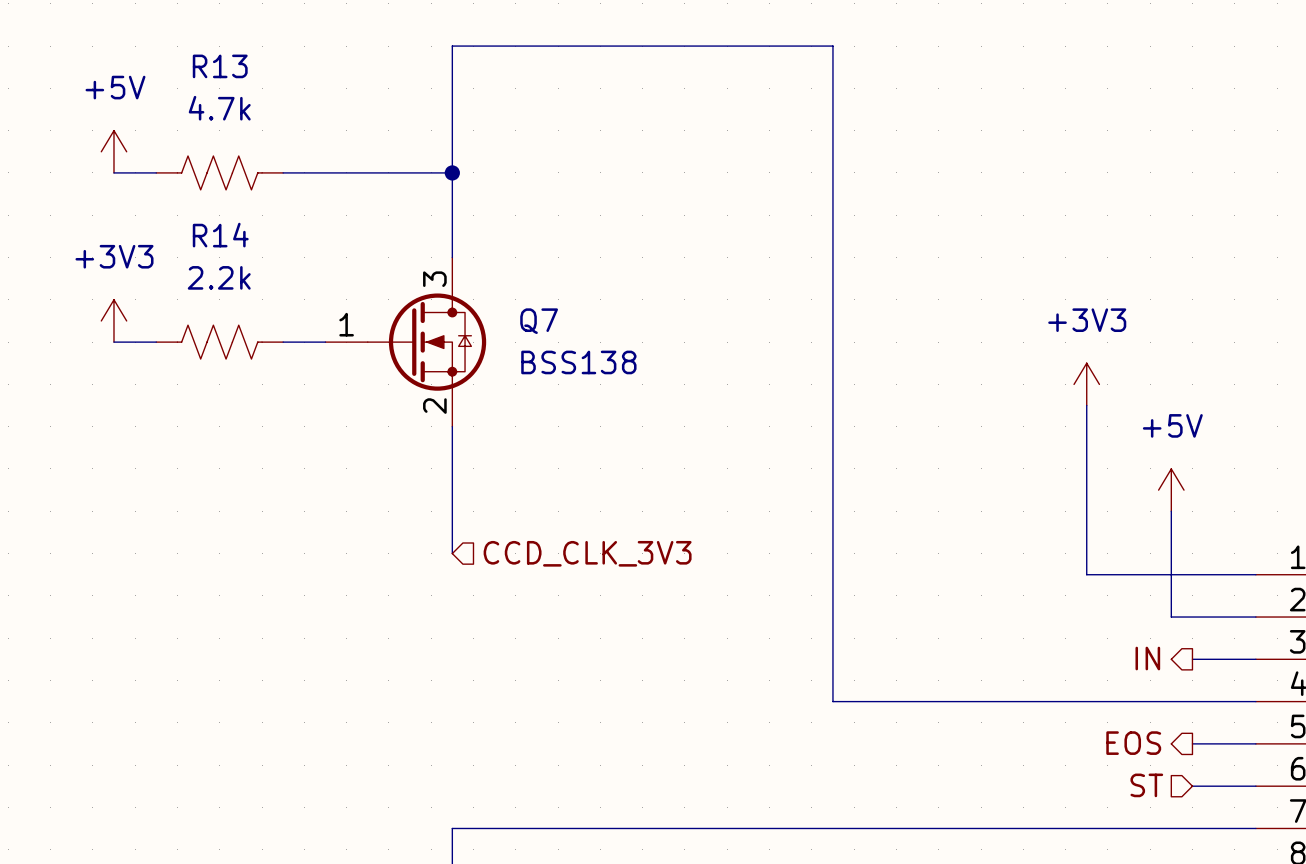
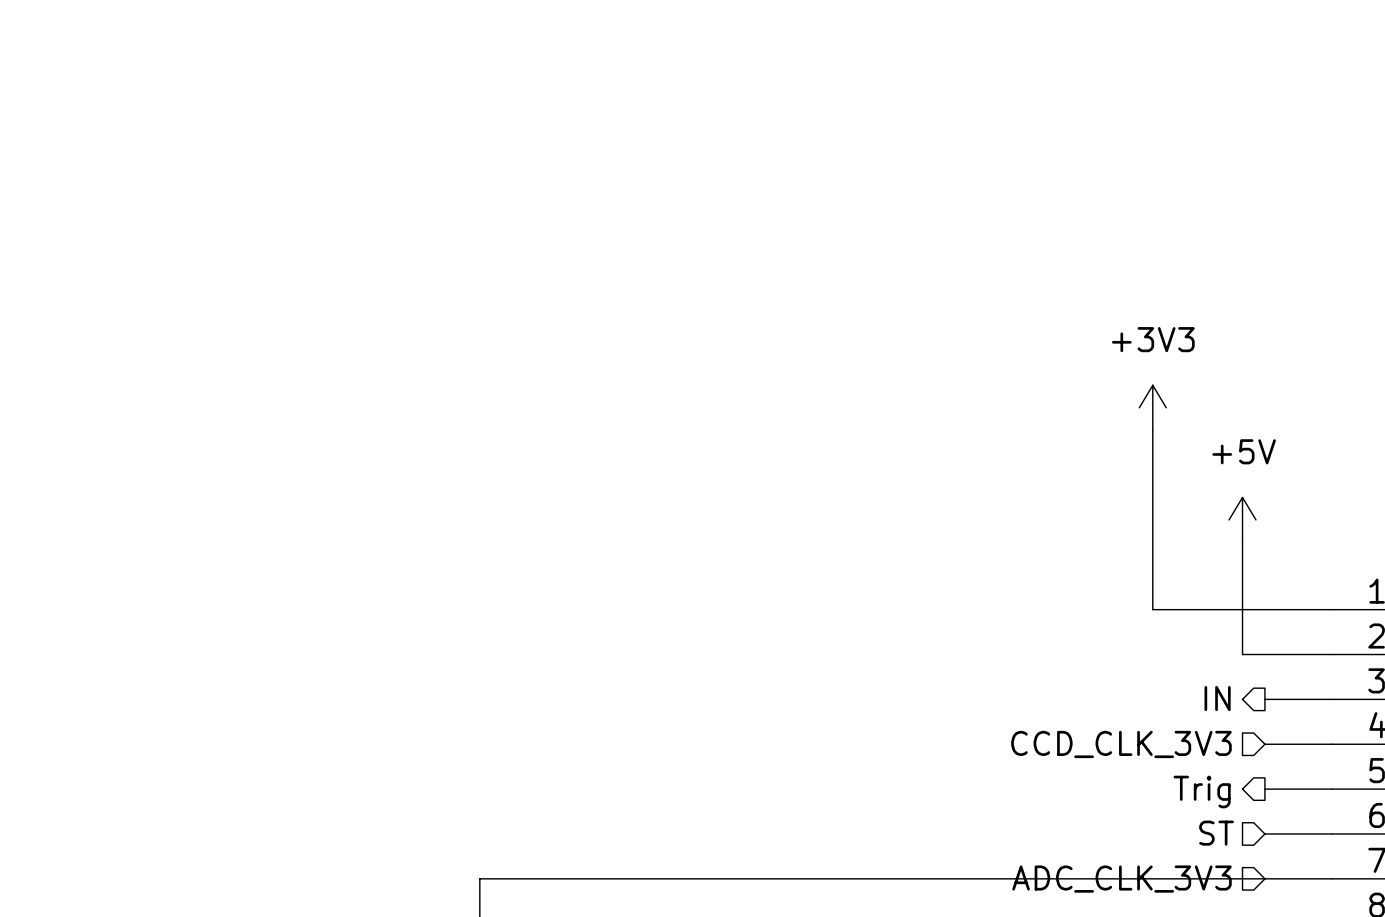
power symbol: +5V (113, 151) -> none
wire: (113, 172) (156, 172) -> none
R13: 4.7k (219, 172) -> none
wire: (283, 172) (452, 172) -> none
junction: (452, 172) -> none
wire: (452, 257) (452, 46) (832, 46) (832, 701) (1192, 701) -> none
power symbol: +3V3 (113, 320) -> none
wire: (113, 342) (156, 342) -> none
R14: 2.2k (219, 342) -> none
wire: (283, 342) (325, 342) -> none
Q7: BSS138 (405, 342) -> none
wire: (452, 426) (452, 553) -> none
hierarchical label: CCD_CLK_3V3 (587, 553) -> none
hierarchical label: none -> CCD_CLK_3V3 (1121, 744)
hierarchical label: EOS (1133, 743) -> Trig (1202, 792)
hierarchical label: none -> ADC_CLK_3V3 (1121, 879)

